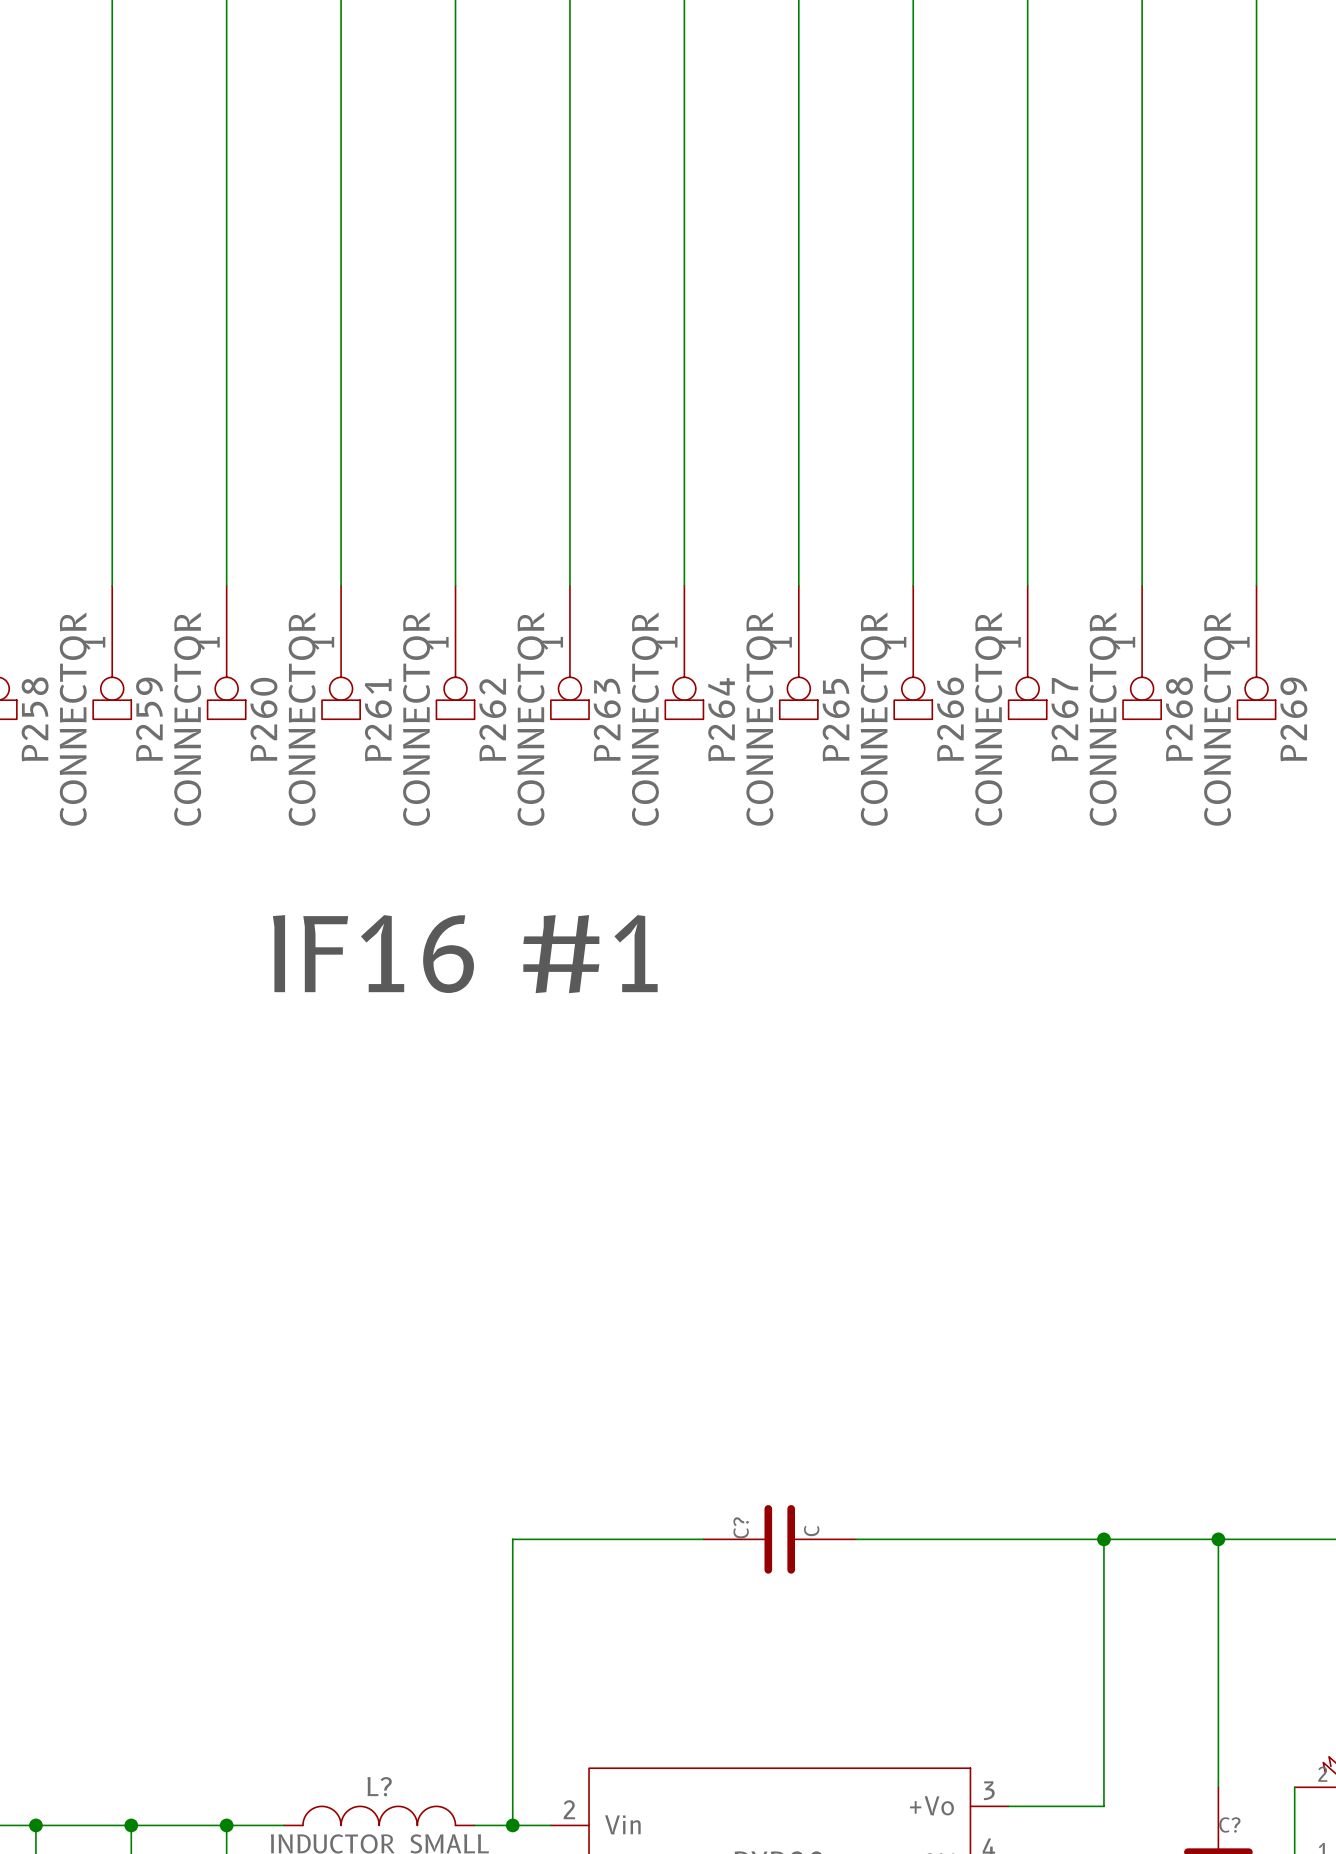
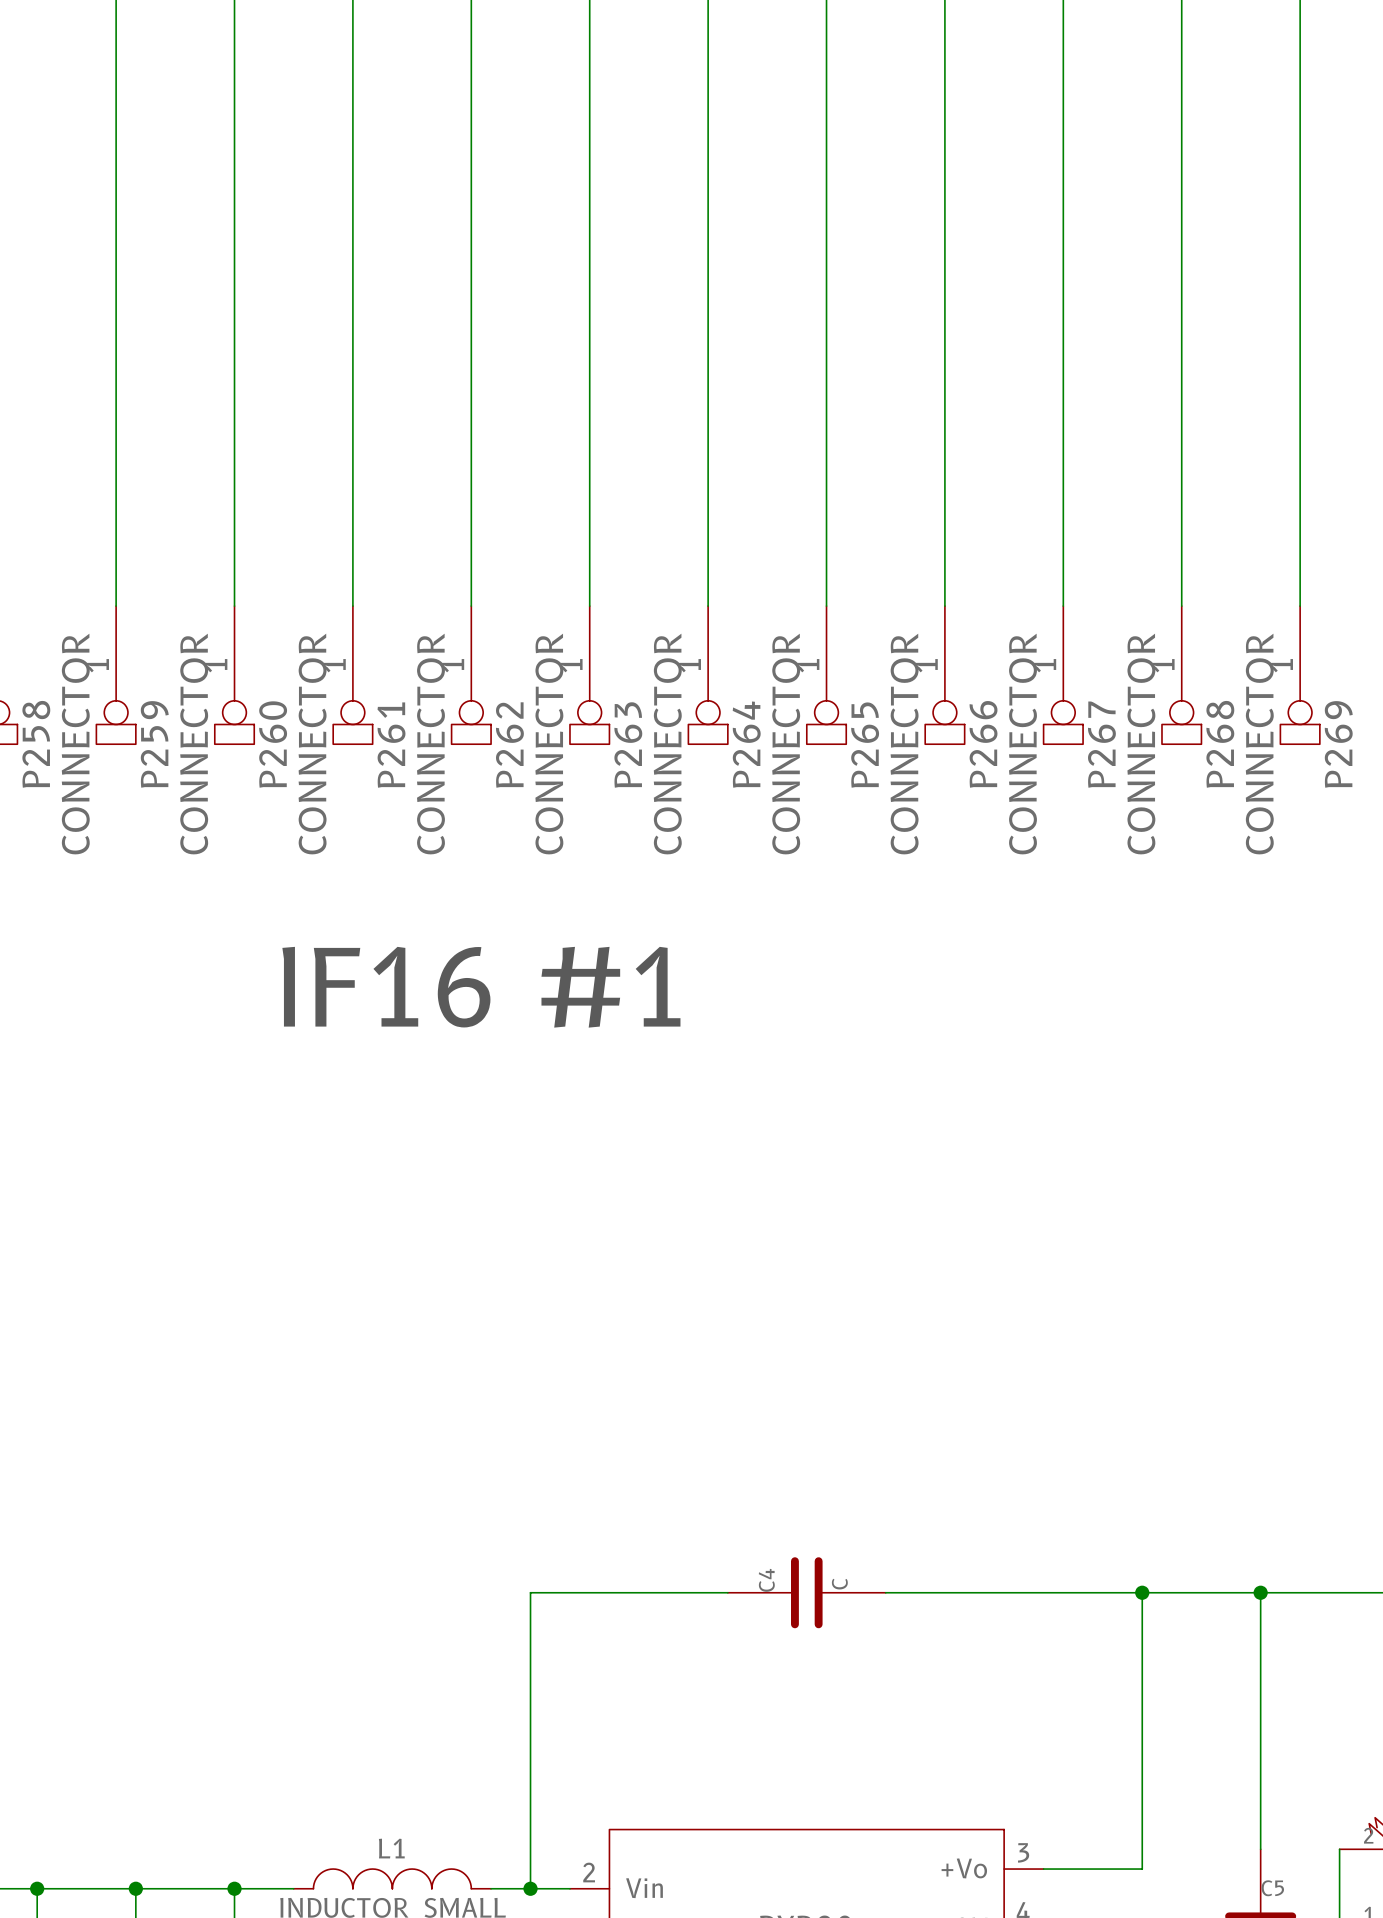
C? name: C? (741, 1527) -> C4 (766, 1580)
L? name: L? (379, 1786) -> L1 (391, 1848)
C? name: C? (1229, 1824) -> C5 (1272, 1888)

